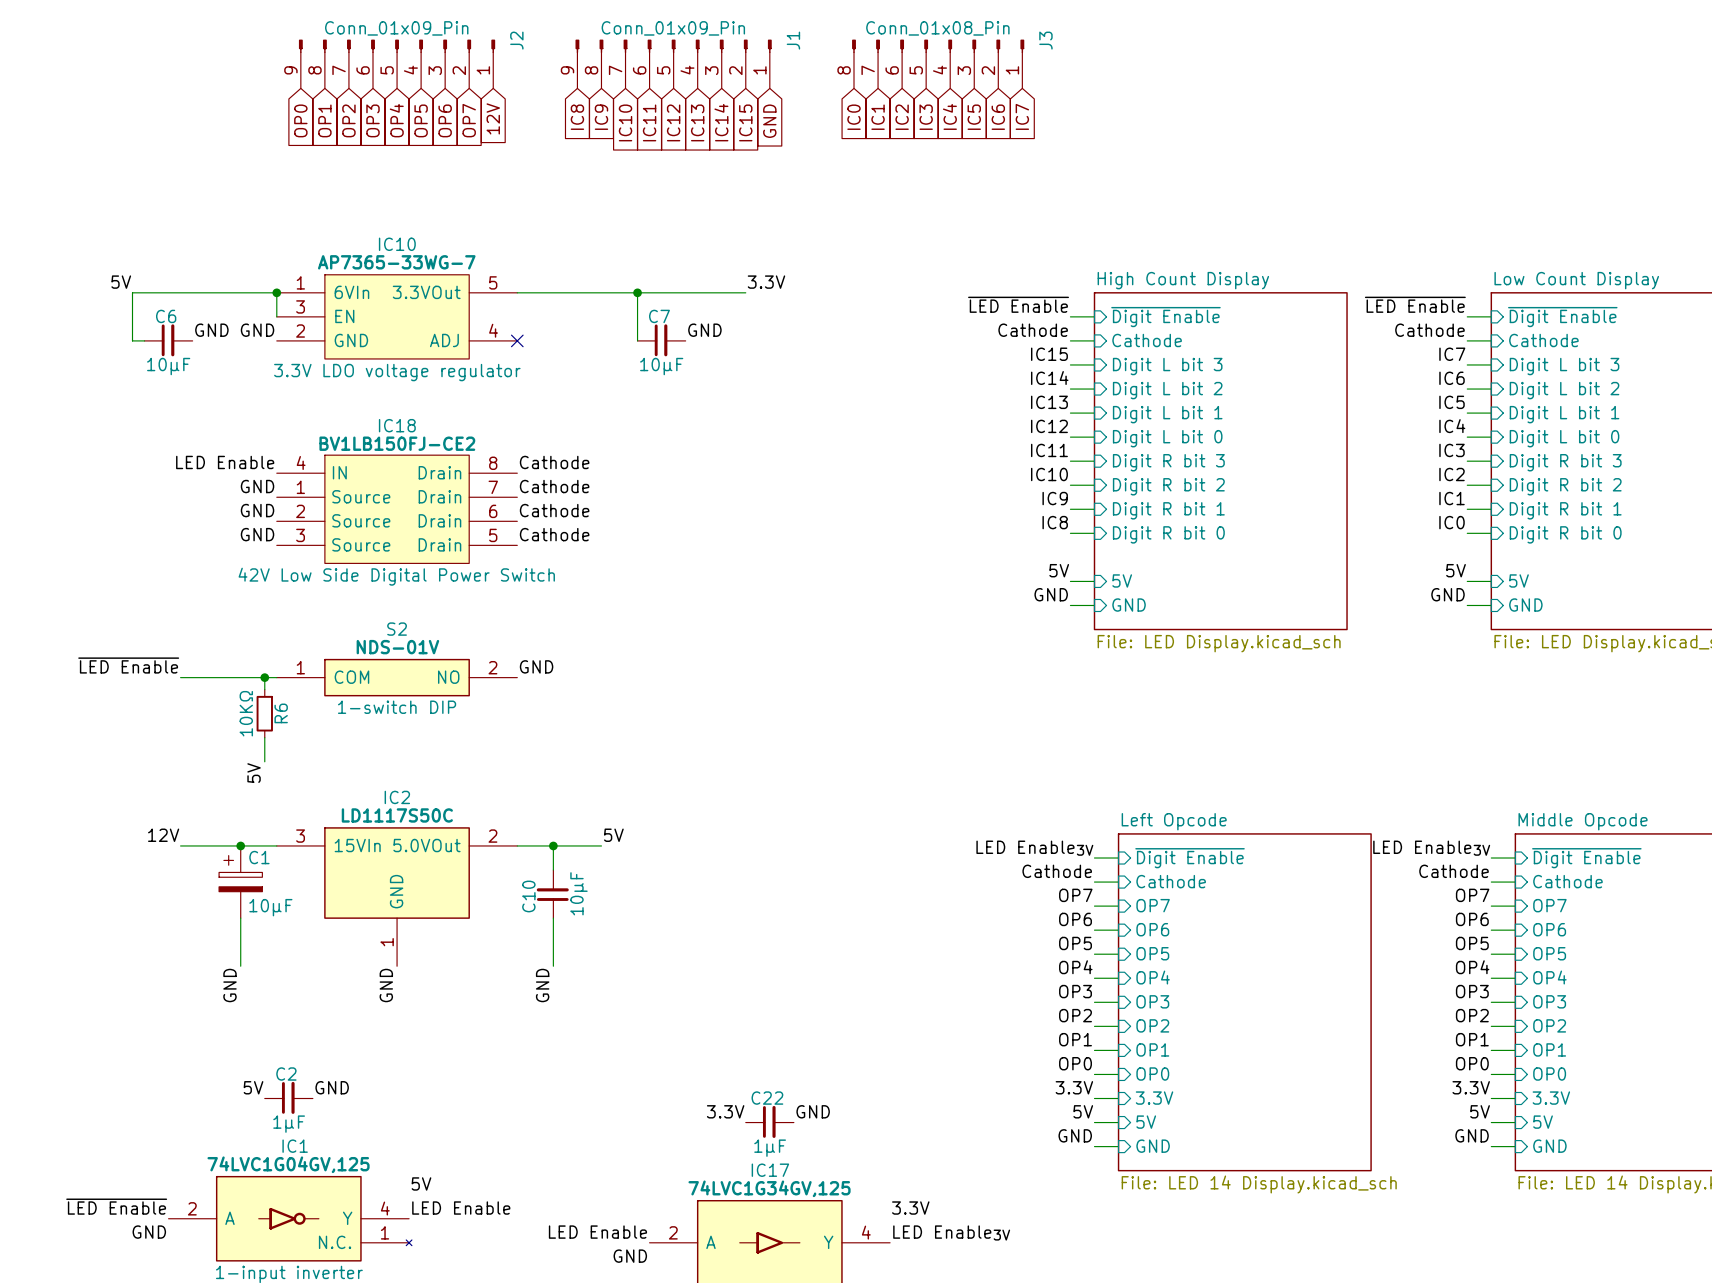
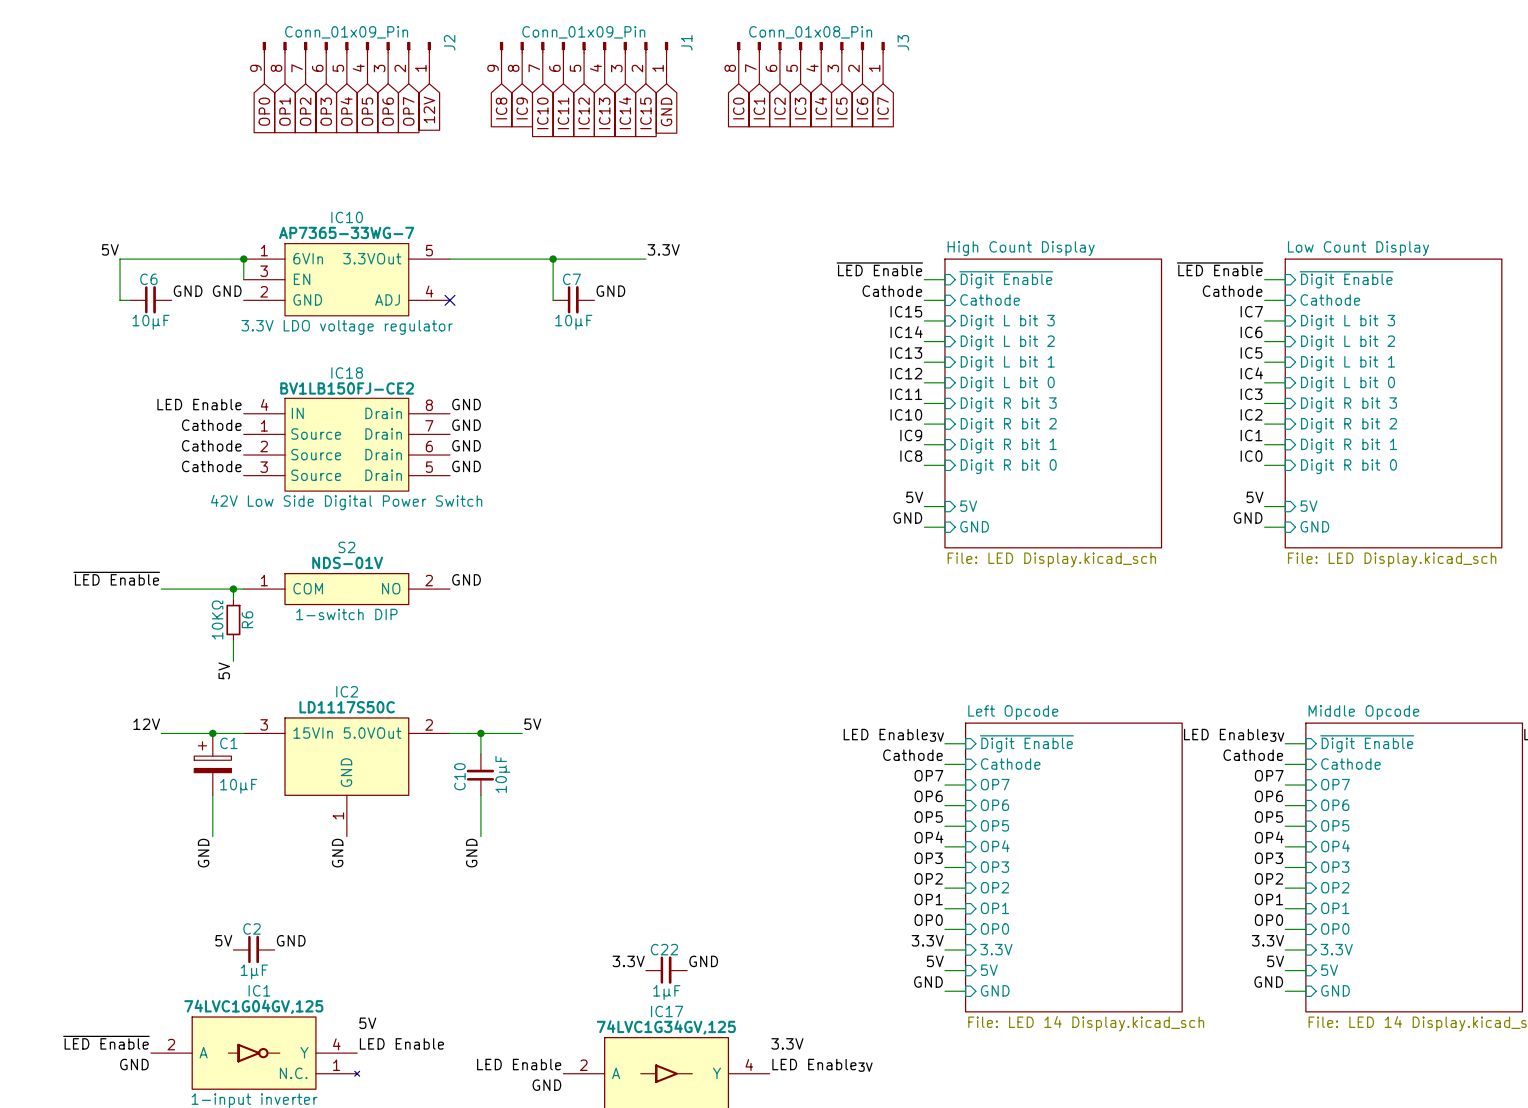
label: Cathode (554, 462) -> GND (466, 404)
label: GND (257, 486) -> Cathode (211, 425)
label: Cathode (554, 486) -> GND (466, 425)
label: GND (257, 510) -> Cathode (211, 445)
label: Cathode (554, 510) -> GND (466, 445)
label: GND (257, 534) -> Cathode (211, 466)
label: Cathode (554, 534) -> GND (466, 466)

